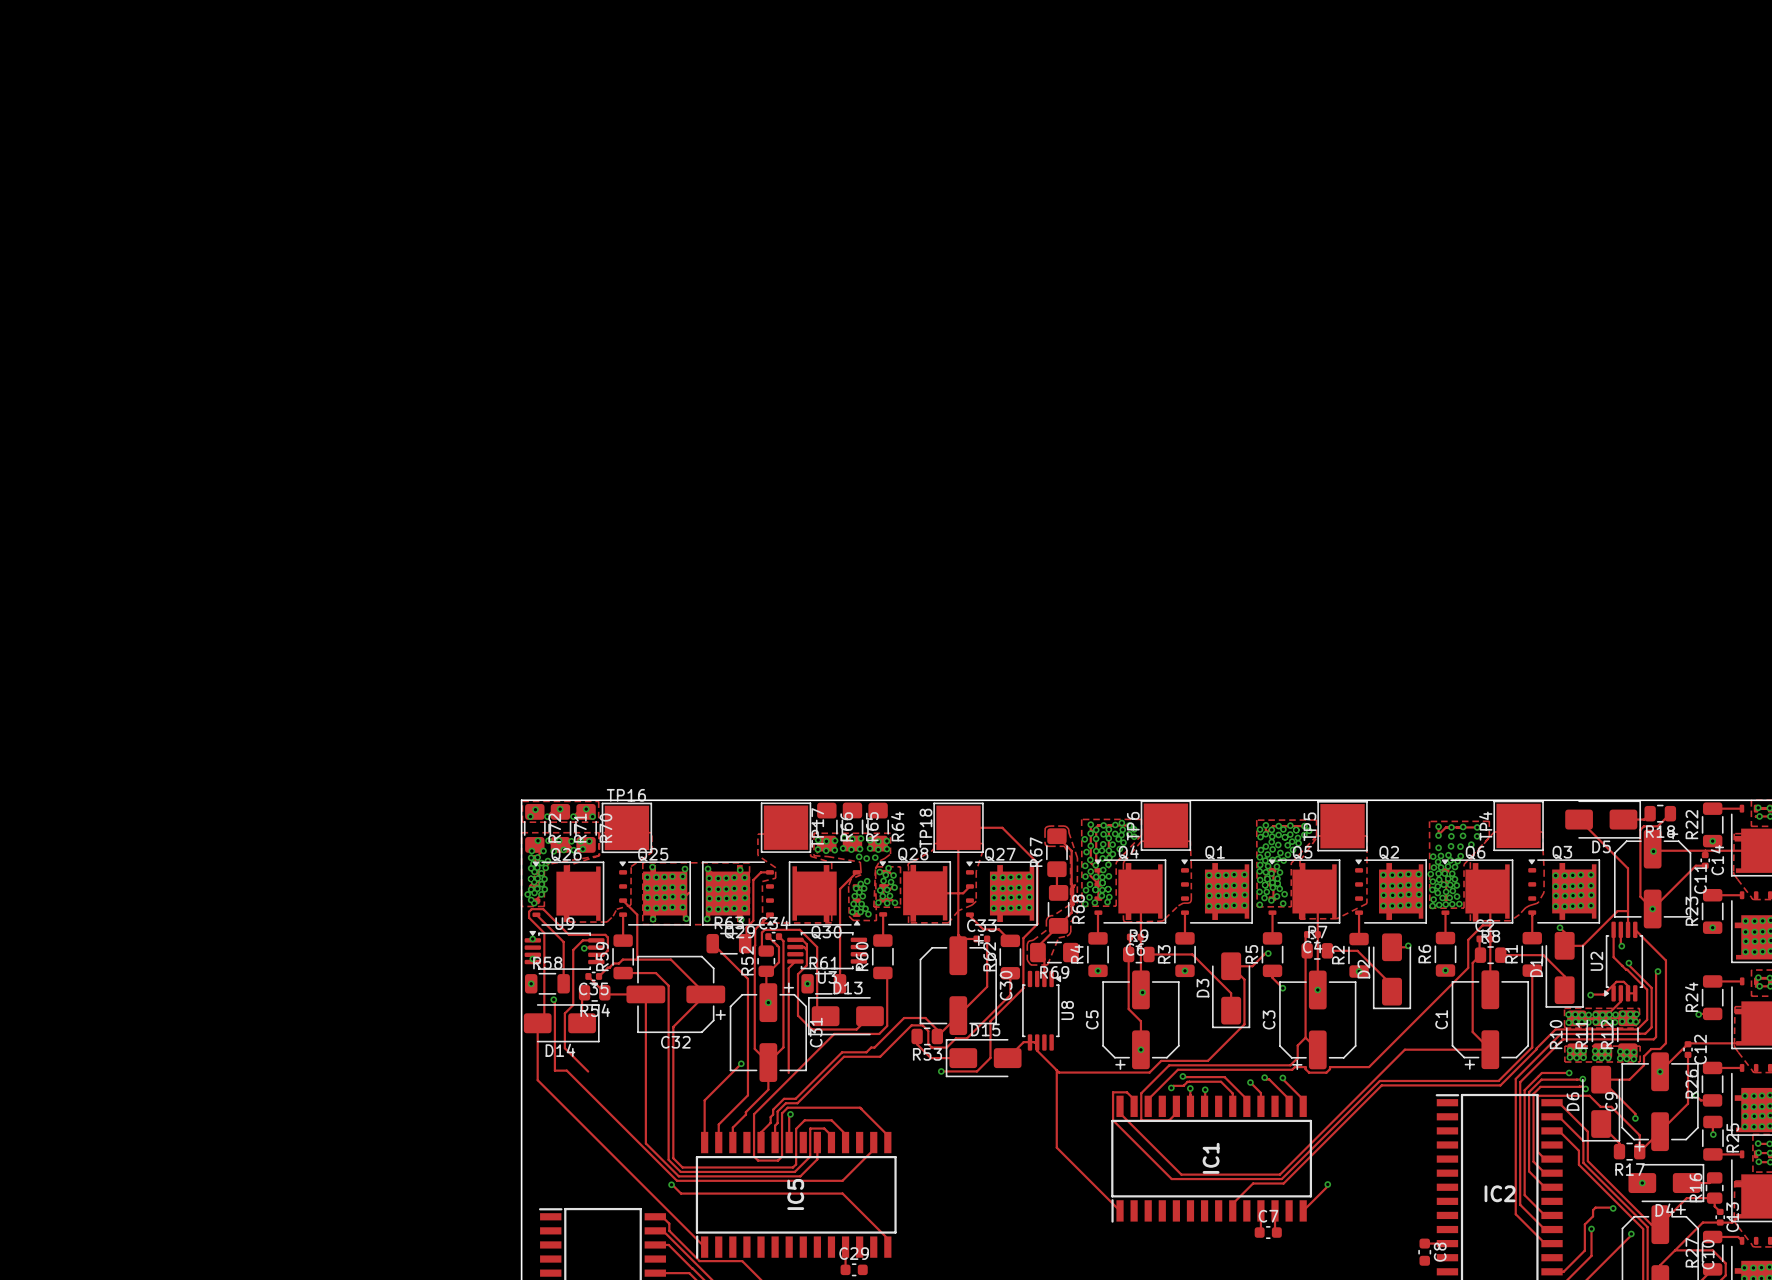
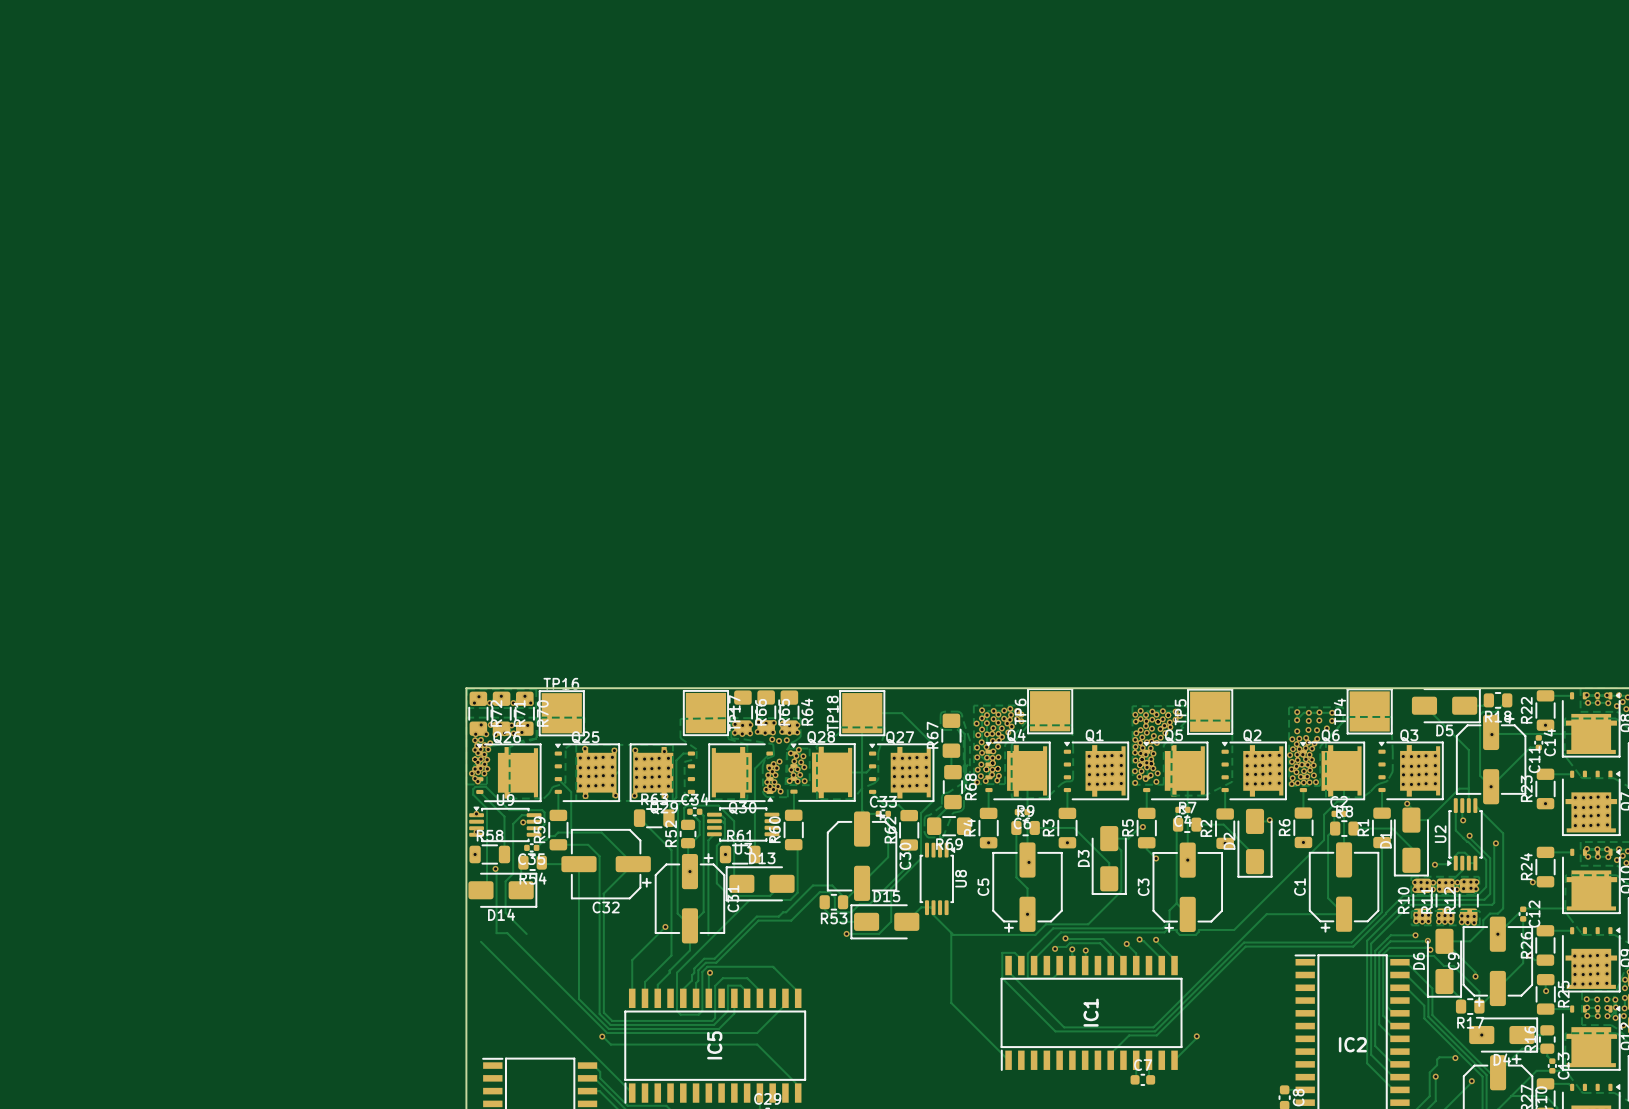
track: (537, 1023) (537, 1080) -> none

